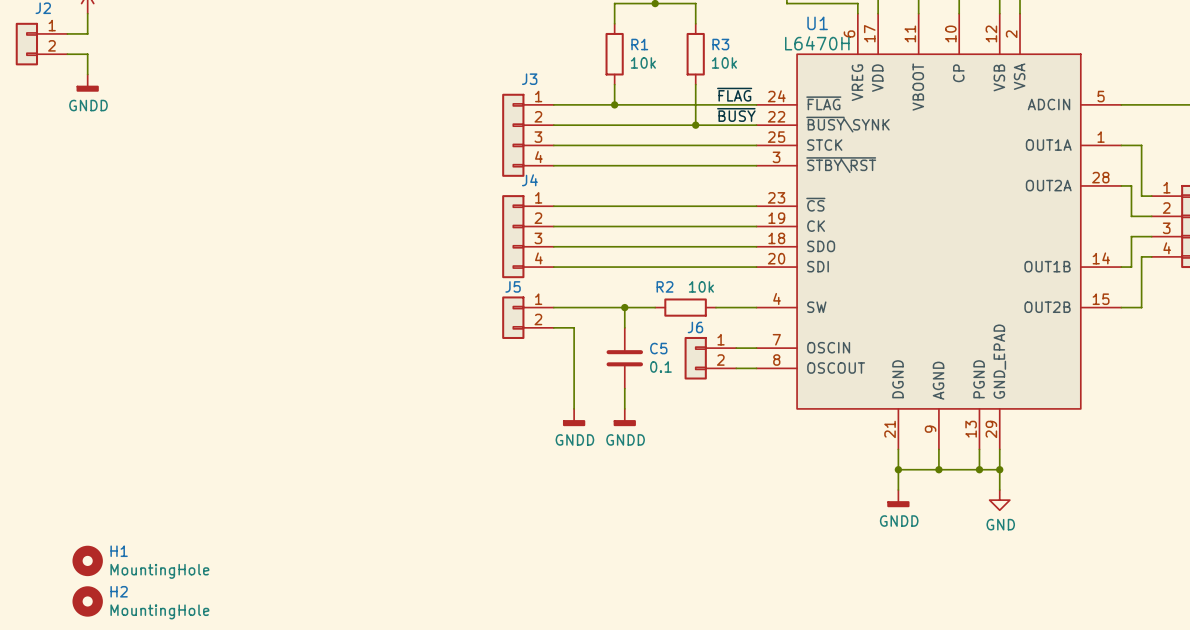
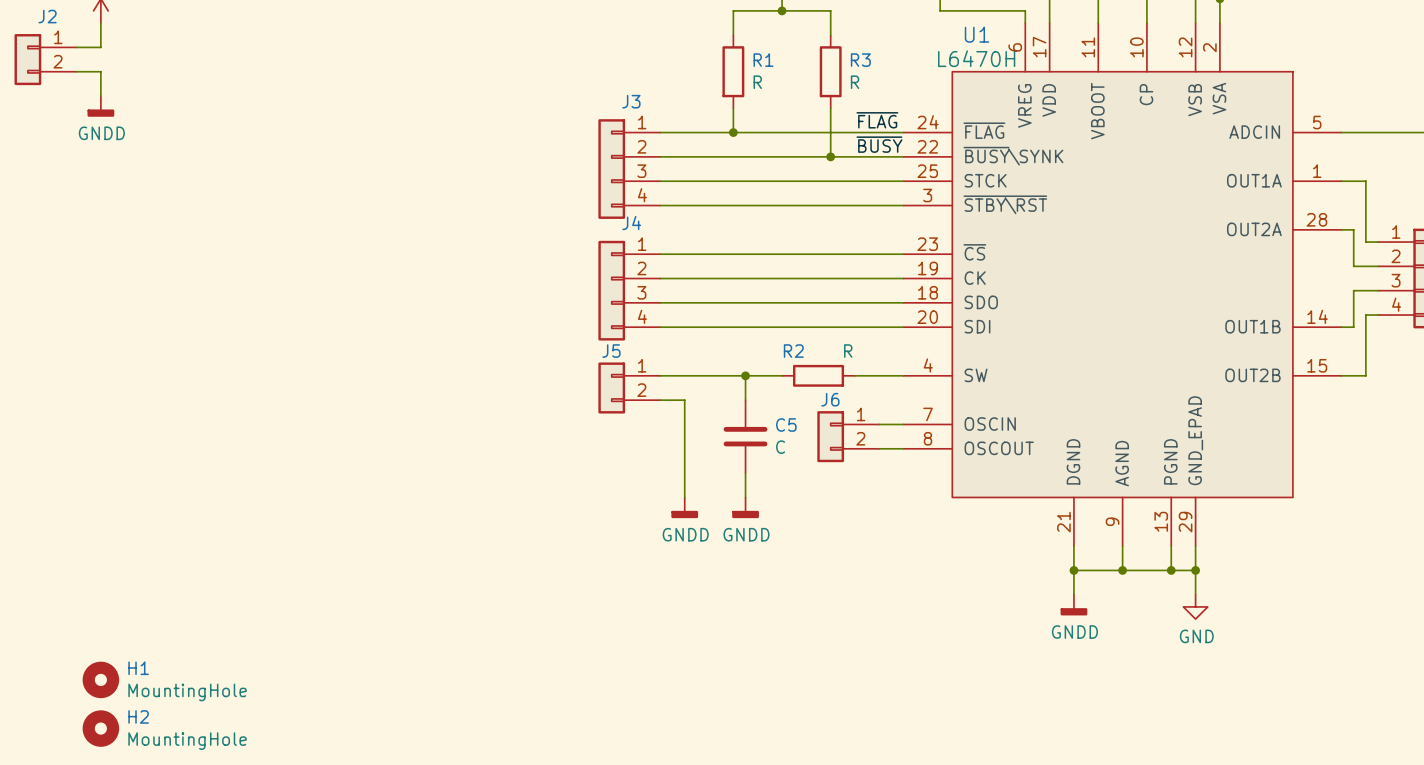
R1 value: 10k (643, 62) -> R (757, 82)
R3 value: 10k (724, 62) -> R (855, 82)
R2 value: 10k (701, 286) -> R (848, 351)
C5 value: 0.1 (660, 366) -> C (780, 447)

